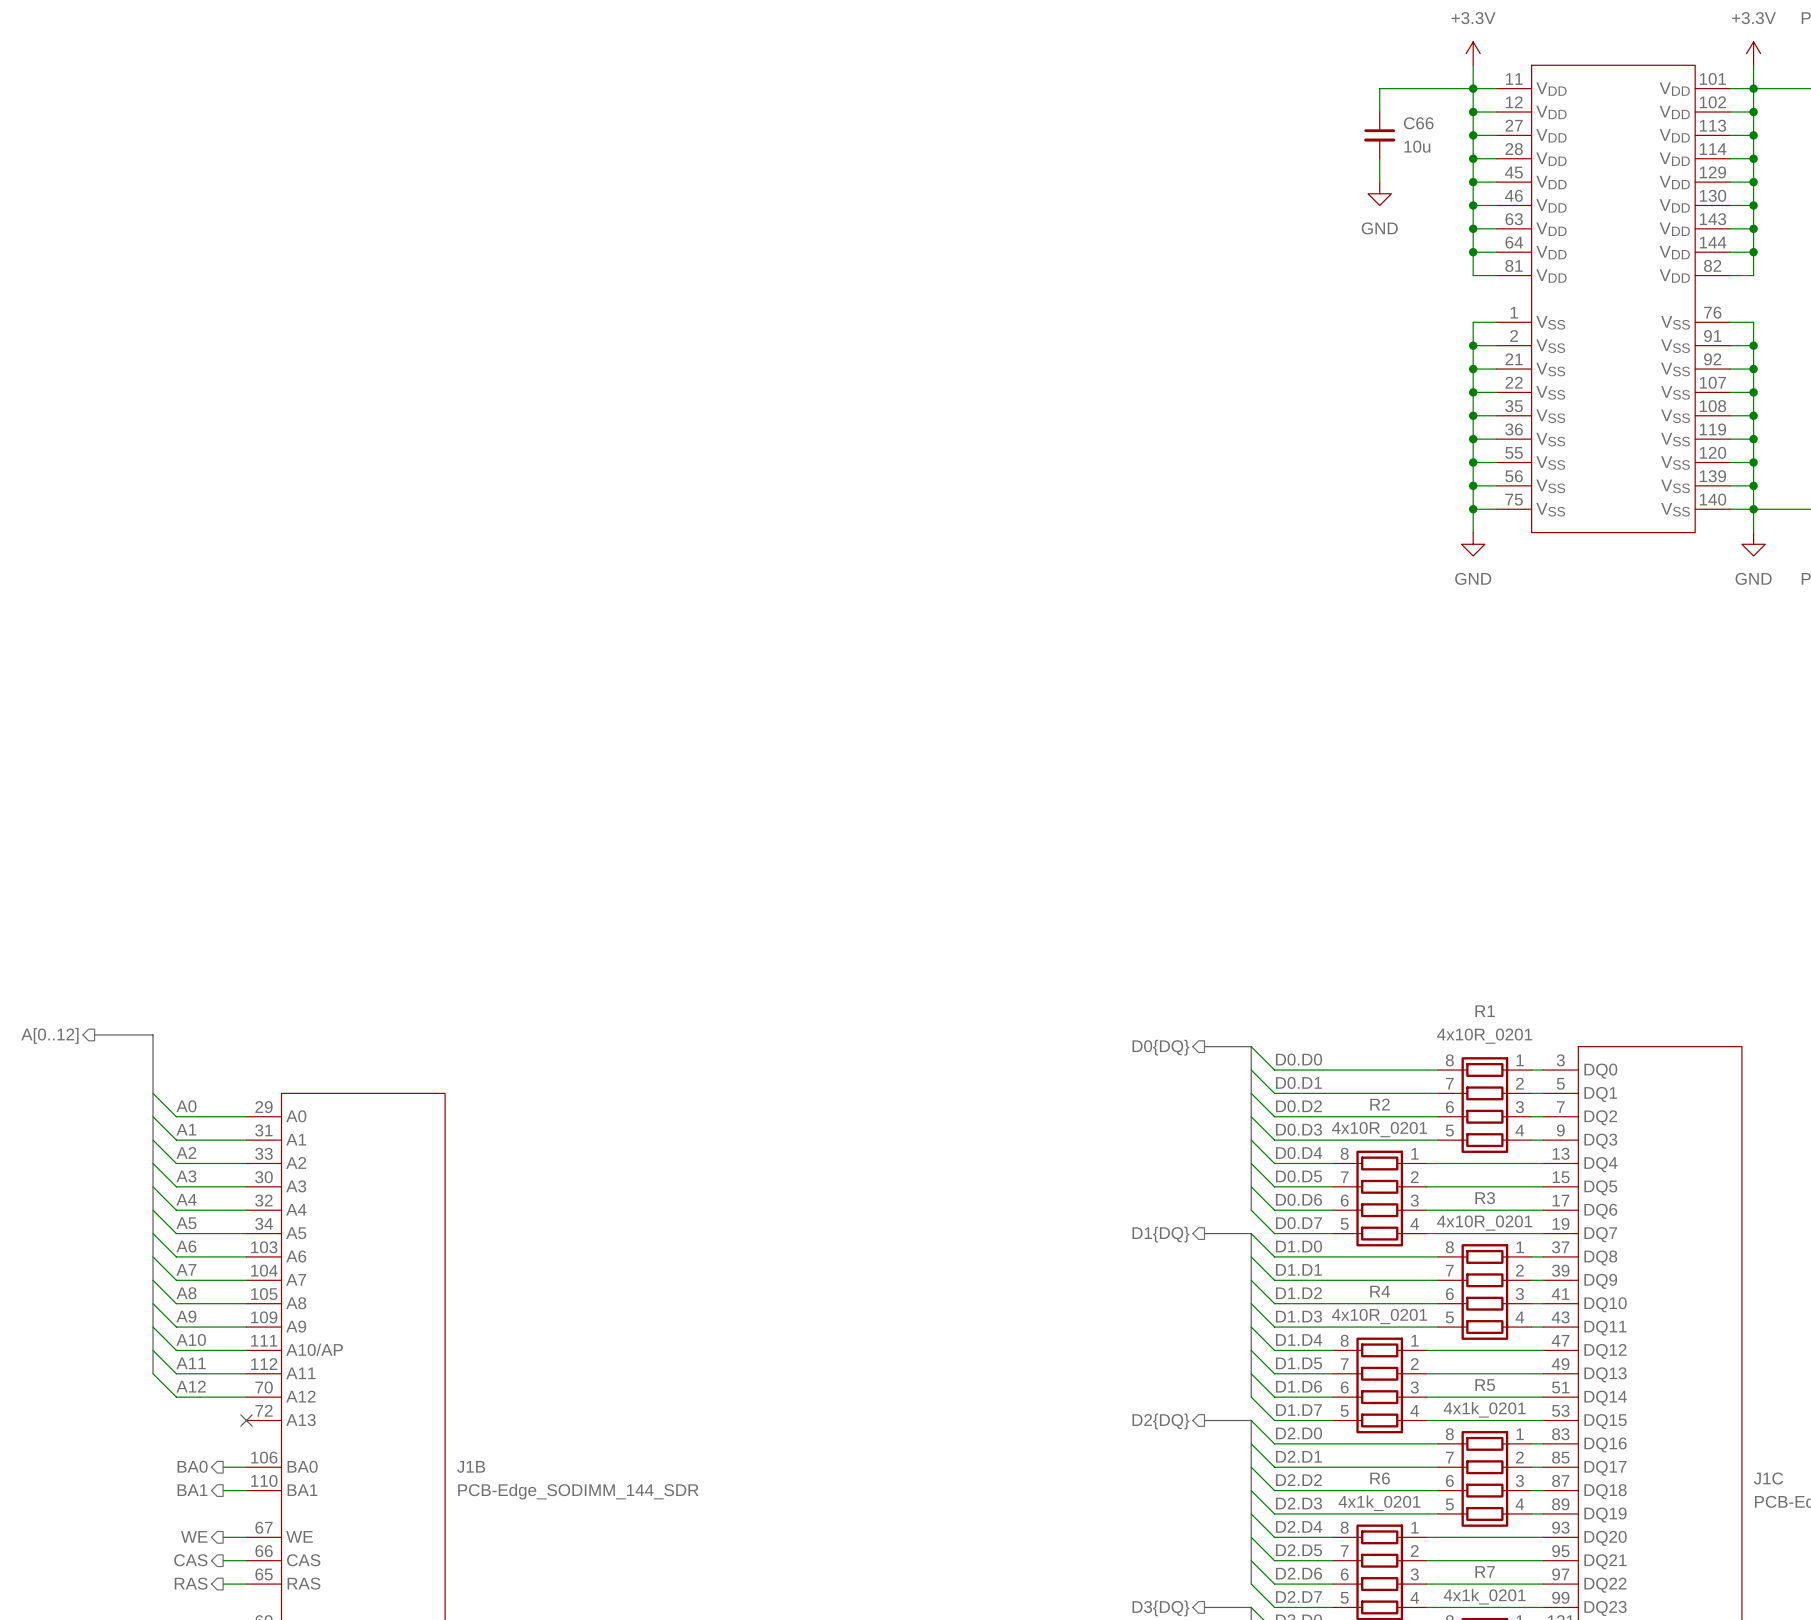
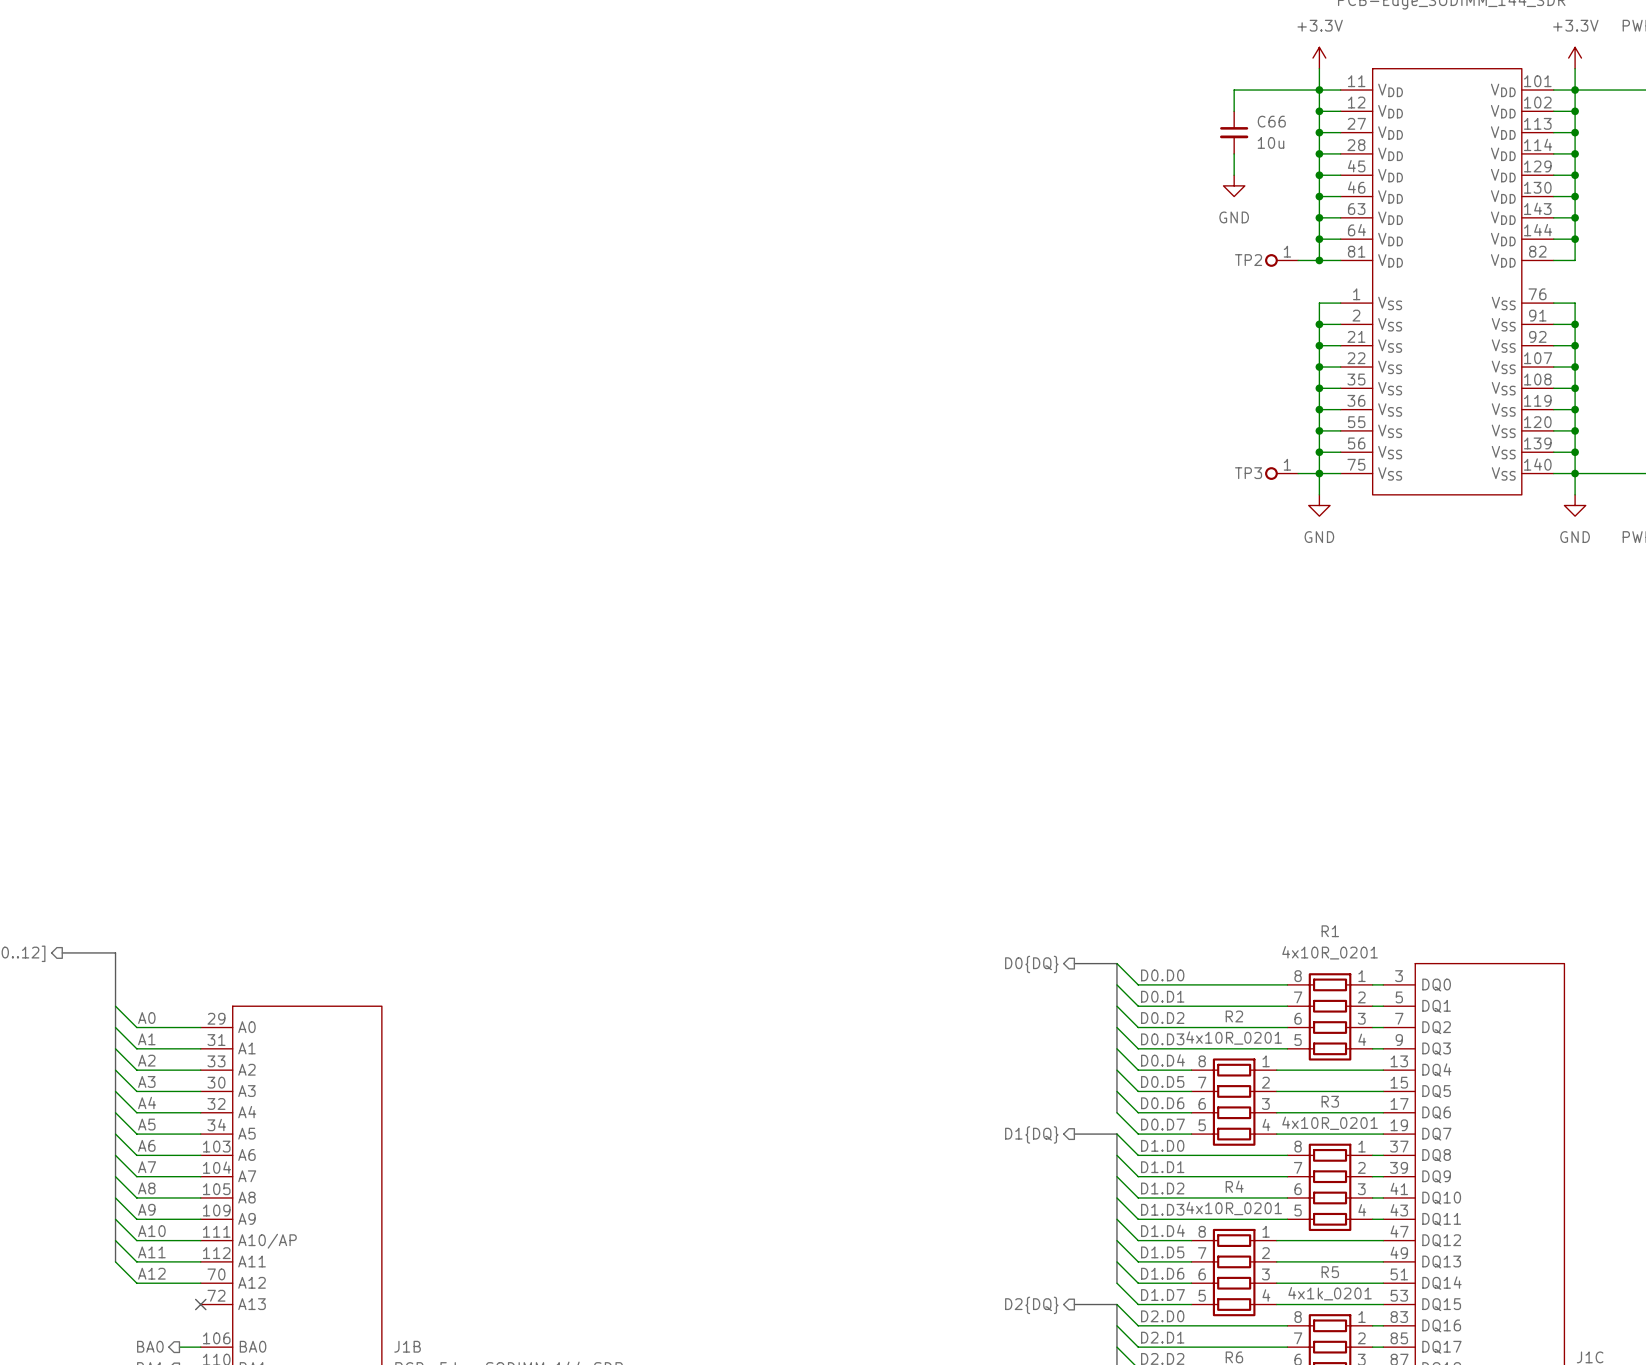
TP2: none -> (1281, 260)
wire: none -> (1298, 260) (1319, 260)
junction: none -> (1319, 260)
TP3: none -> (1281, 473)
wire: none -> (1298, 473) (1319, 473)

